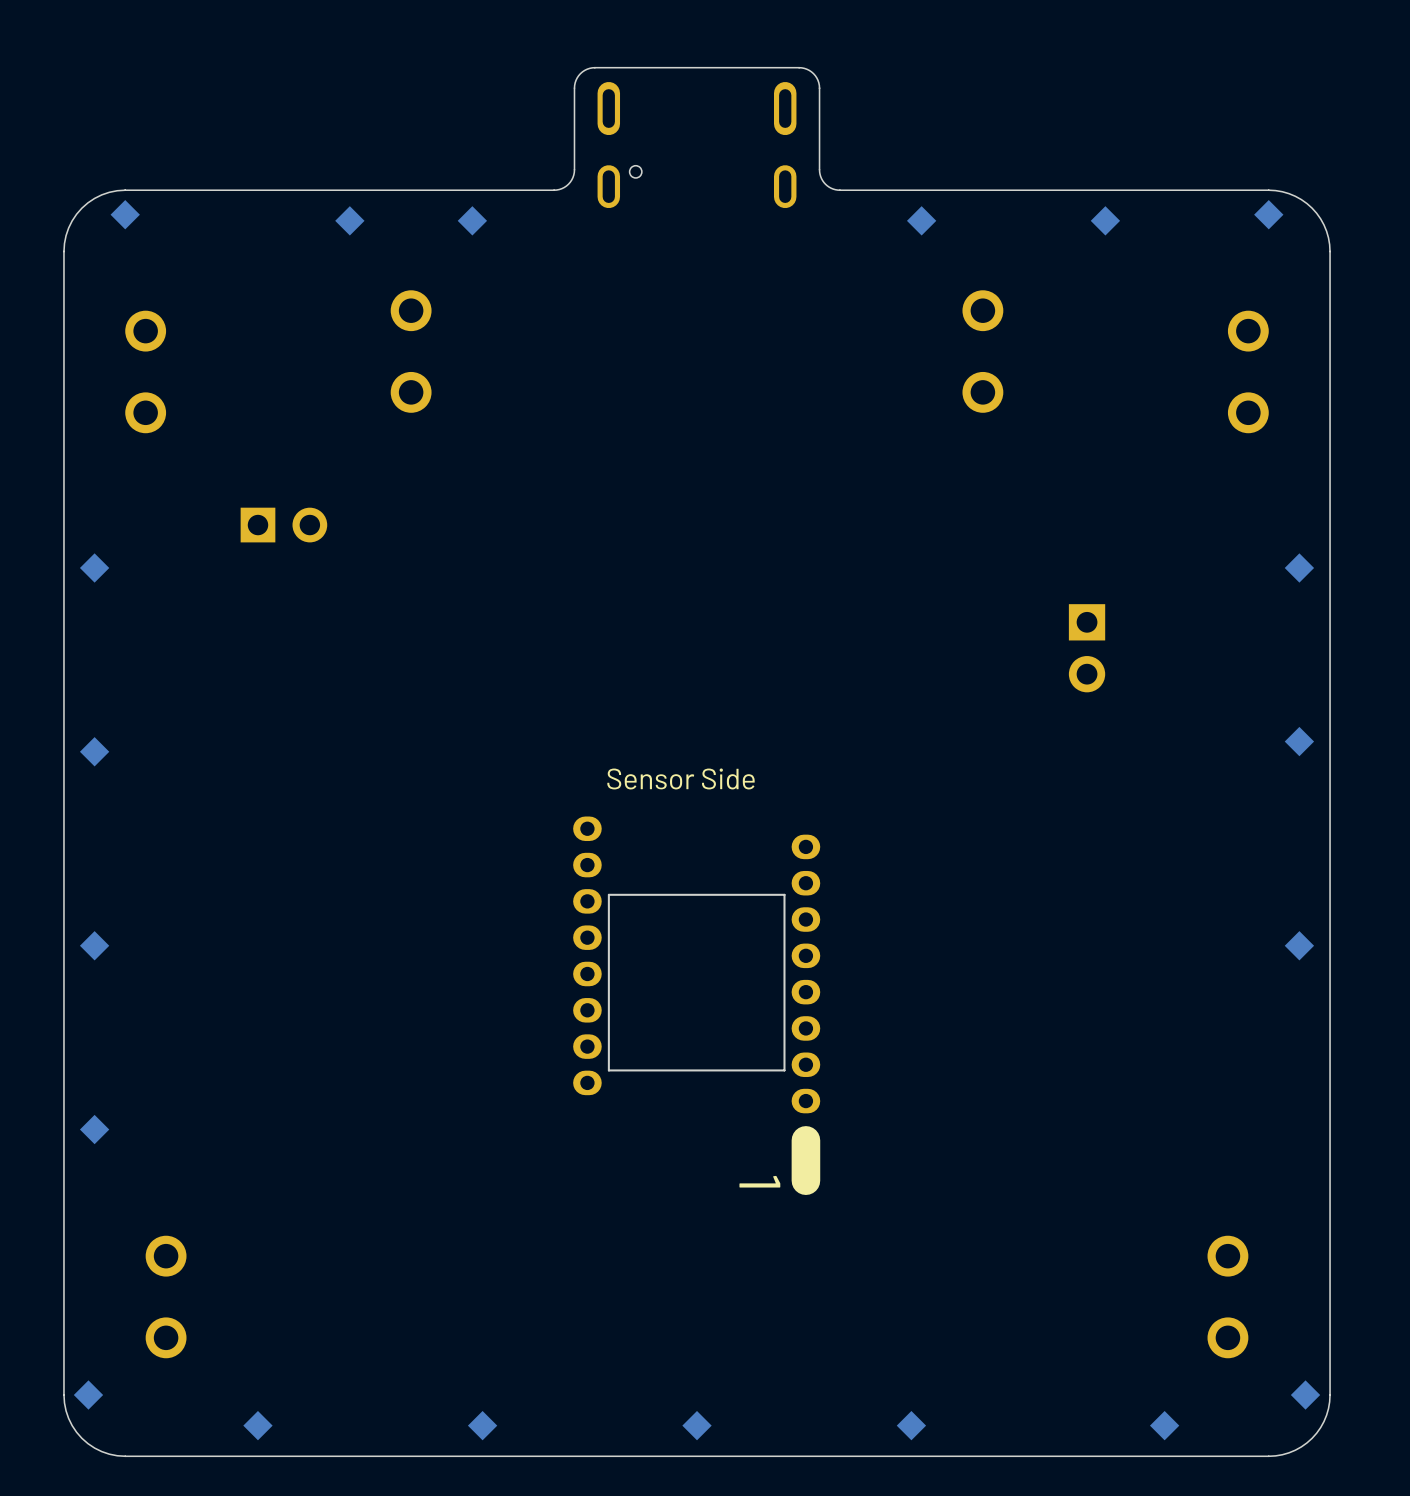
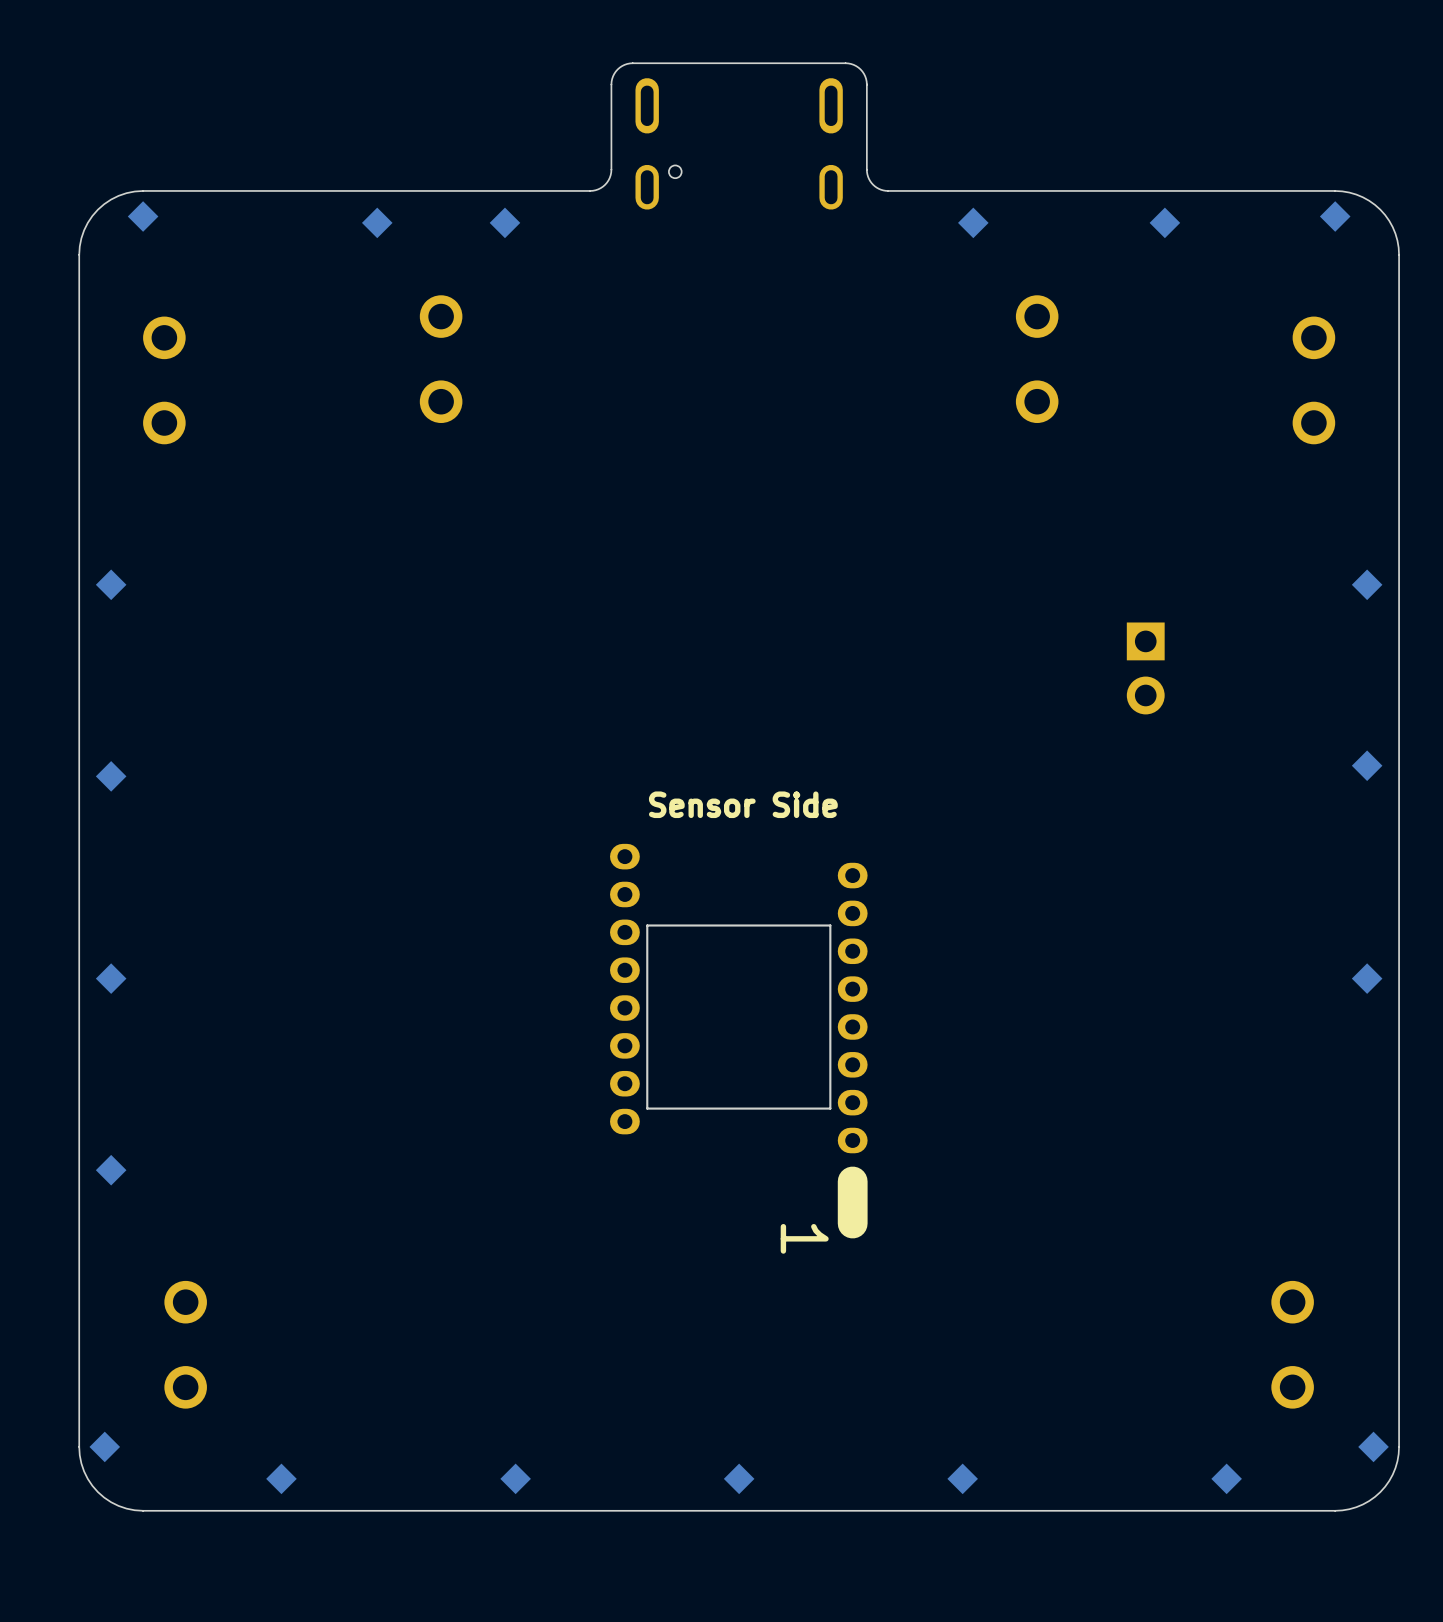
part: (283, 525) -> none

